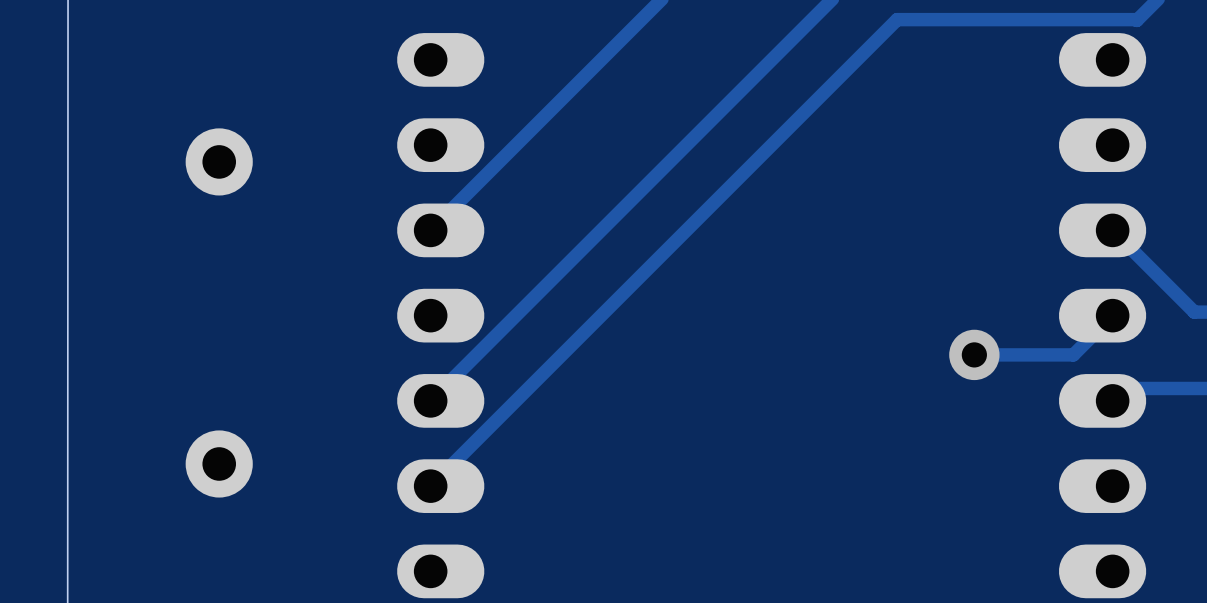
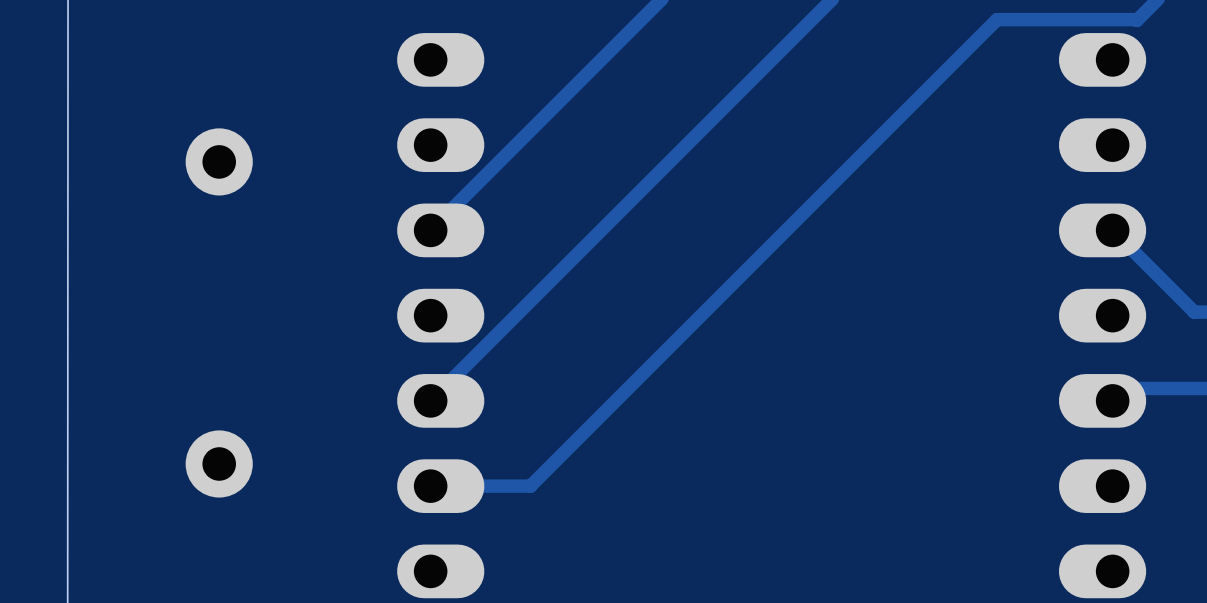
track: (997, 19) (897, 19) (430, 486) -> (997, 19) (530, 486) (430, 486)
track: (1112, 315) (1073, 354) (974, 354) -> none
via: (974, 354) -> none

